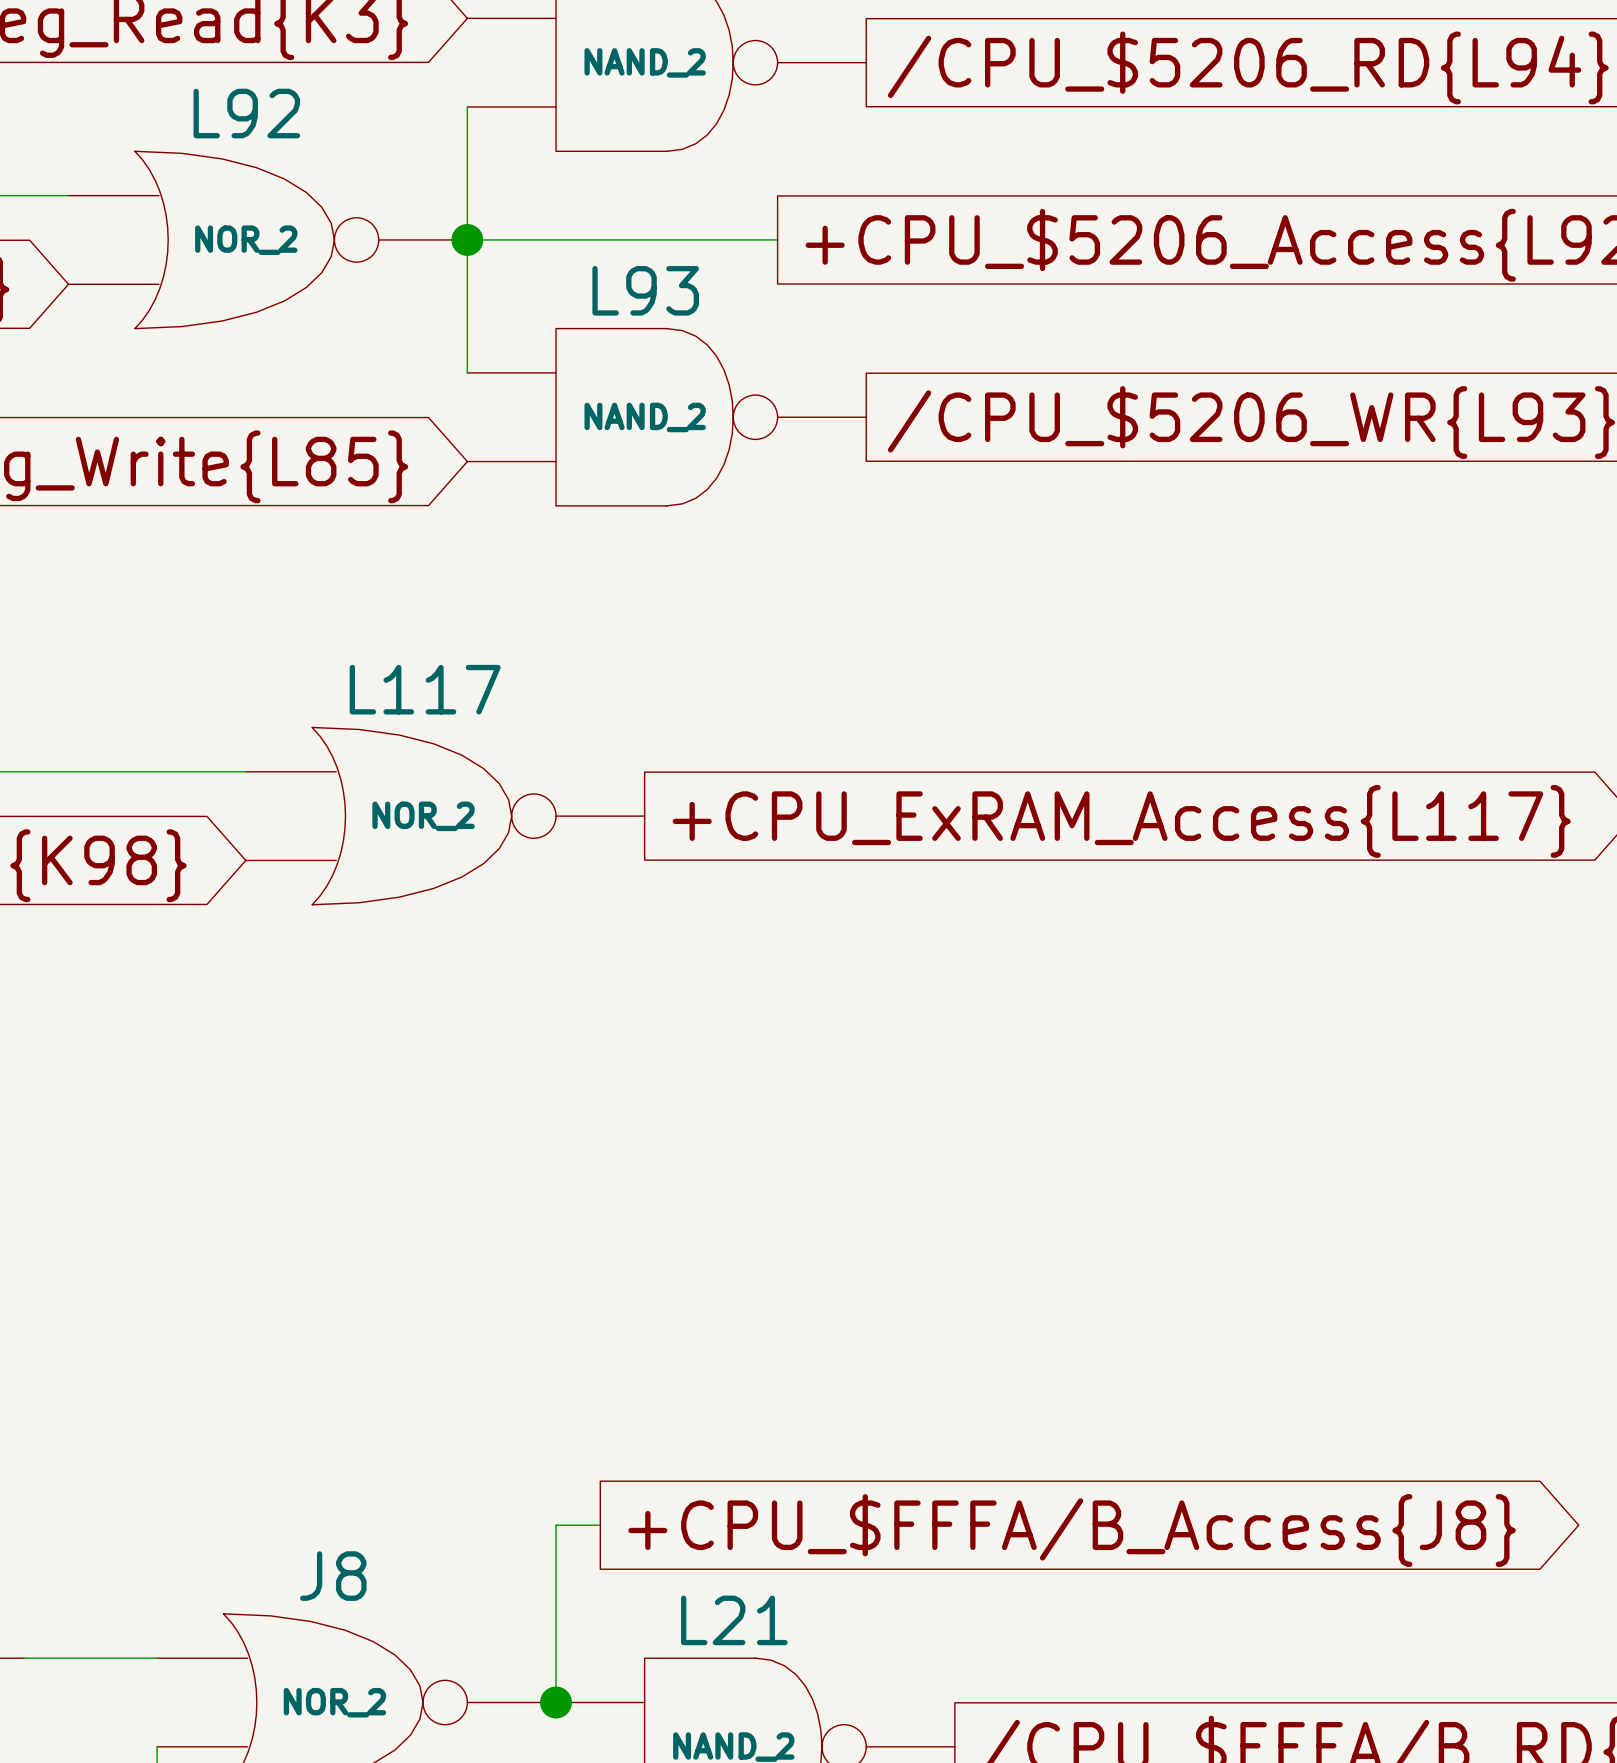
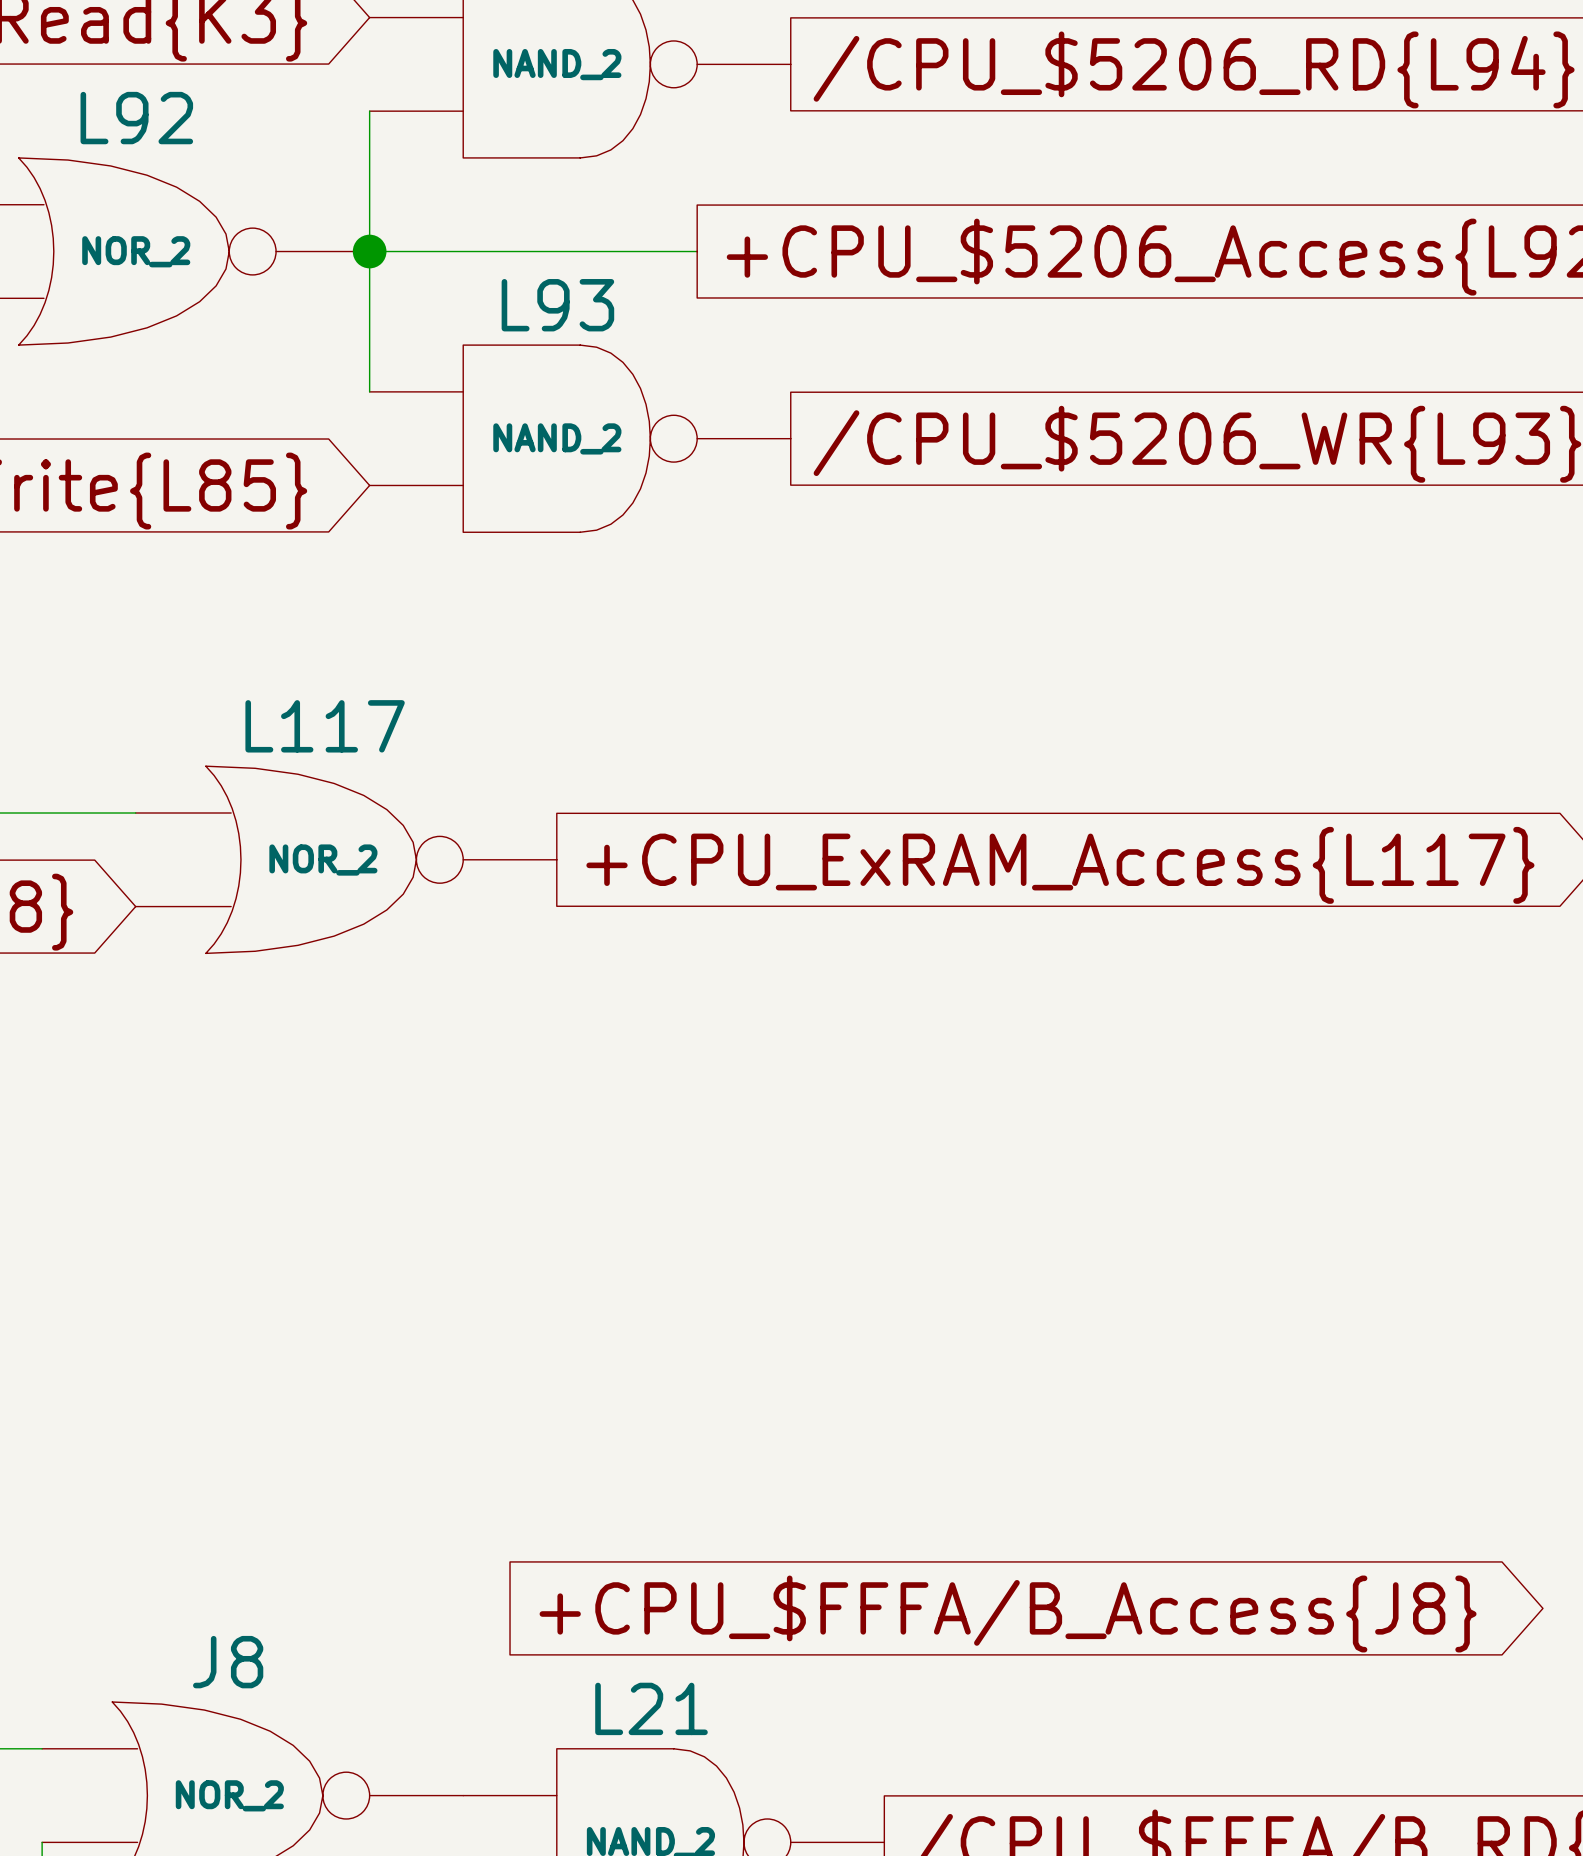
wire: (600, 1525) (556, 1525) (556, 1702) -> none
junction: (556, 1702) -> none

